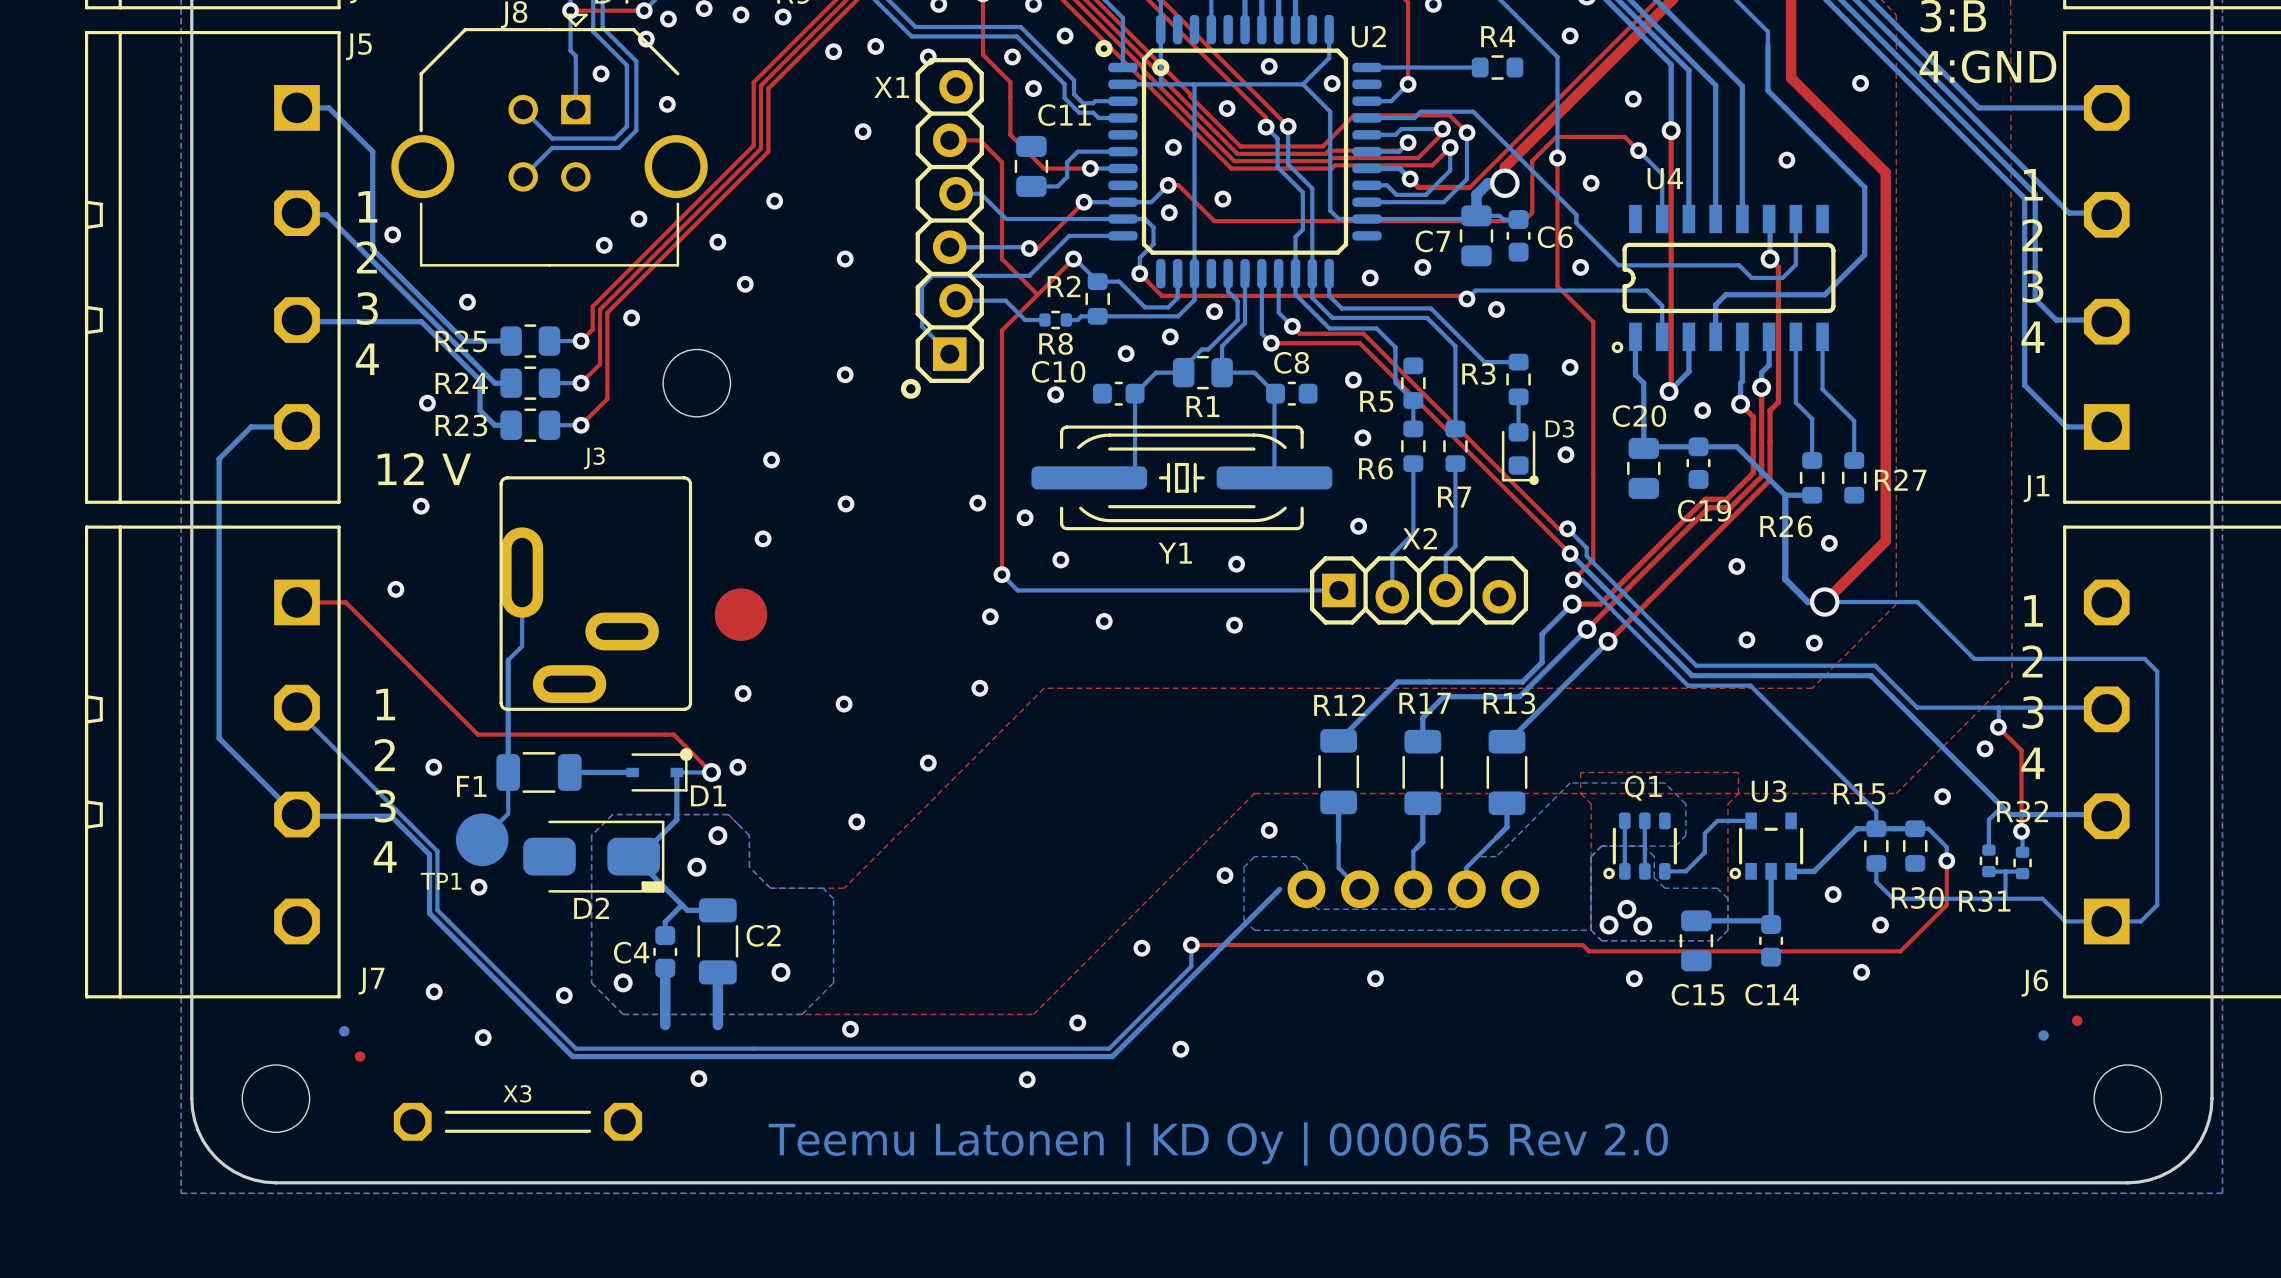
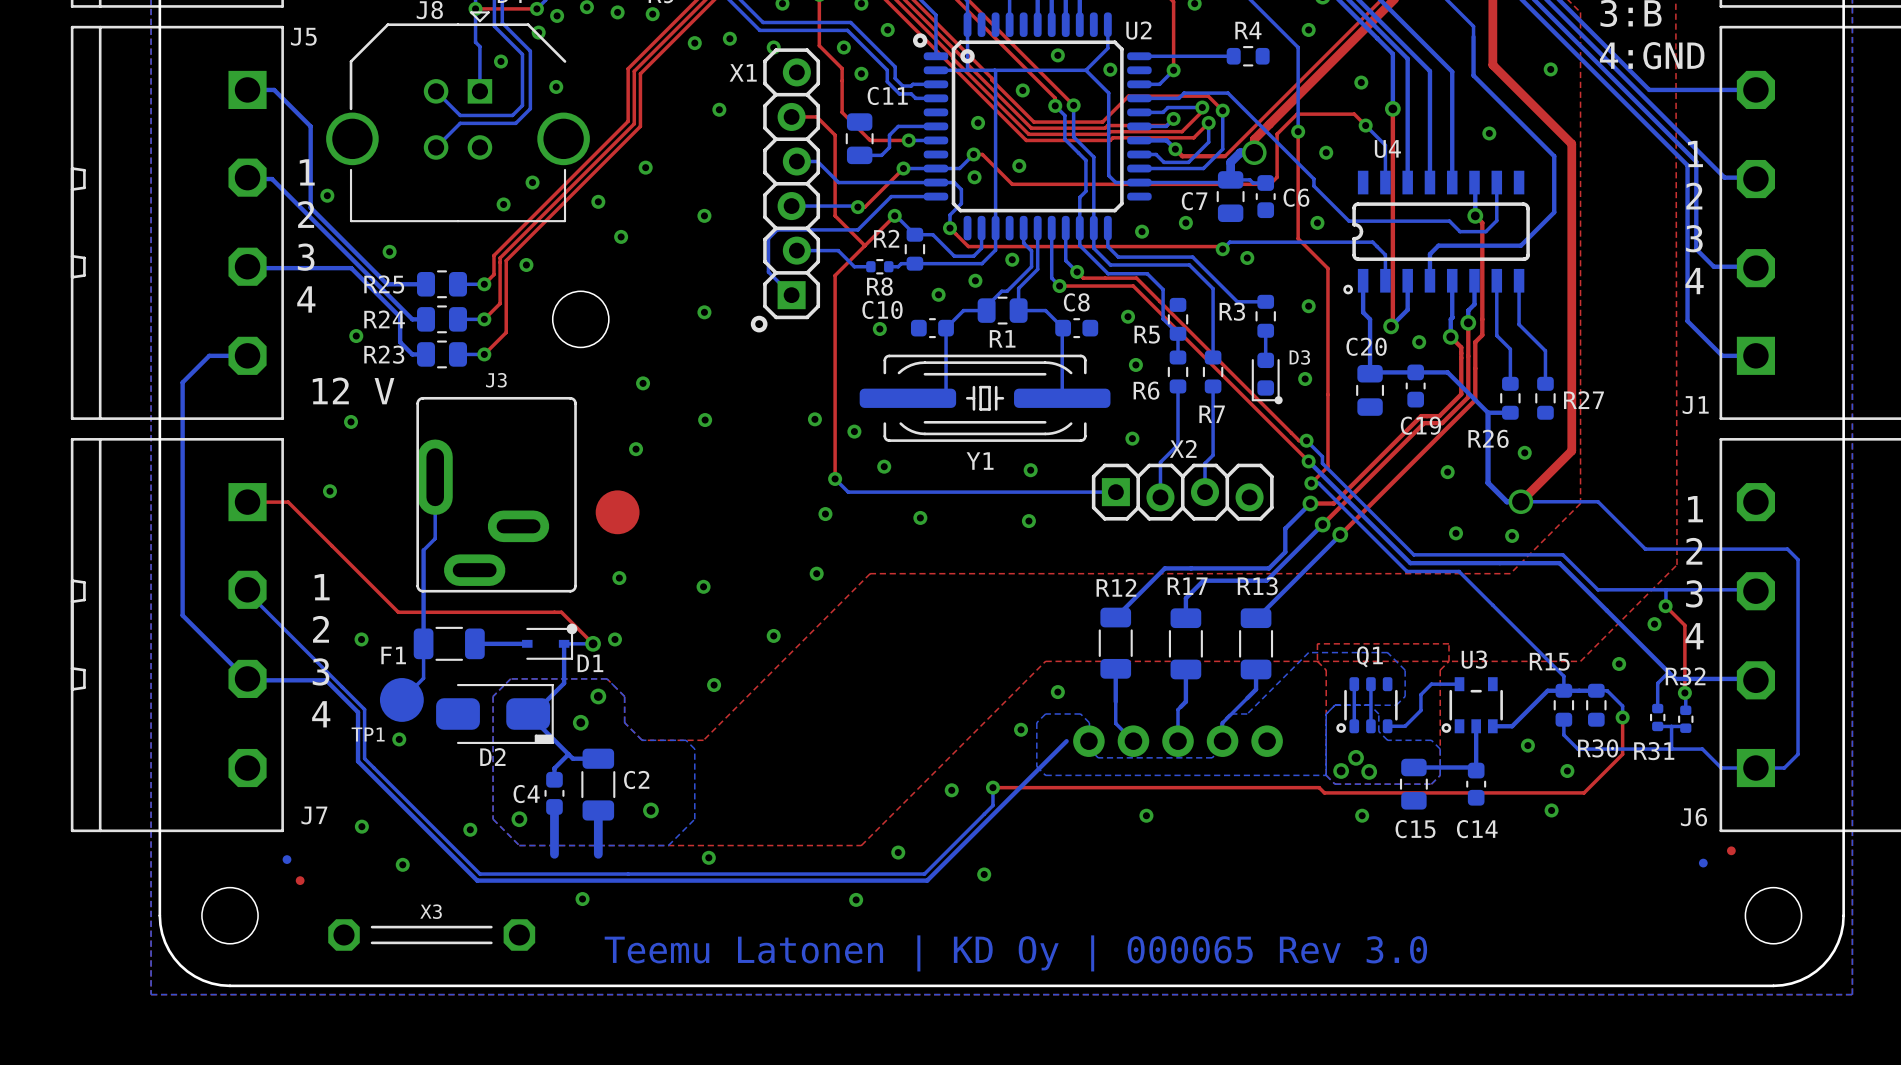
text: Teemu Latonen | KD Oy | 000065 Rev 2.0 (1218, 1143) -> Teemu Latonen | KD Oy | 000065 Rev 3.0 (1015, 953)

